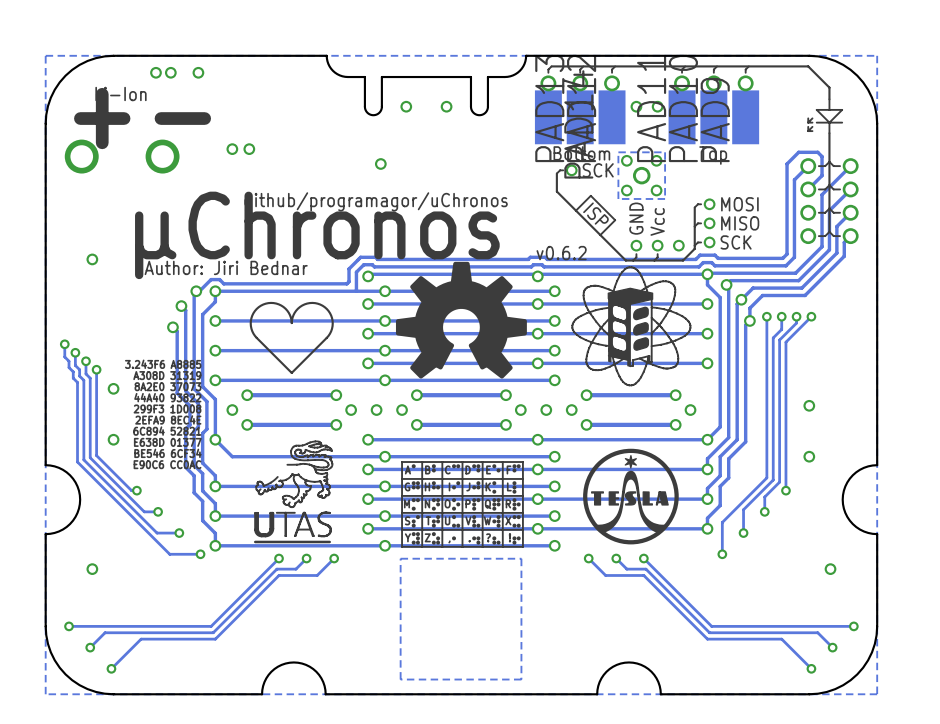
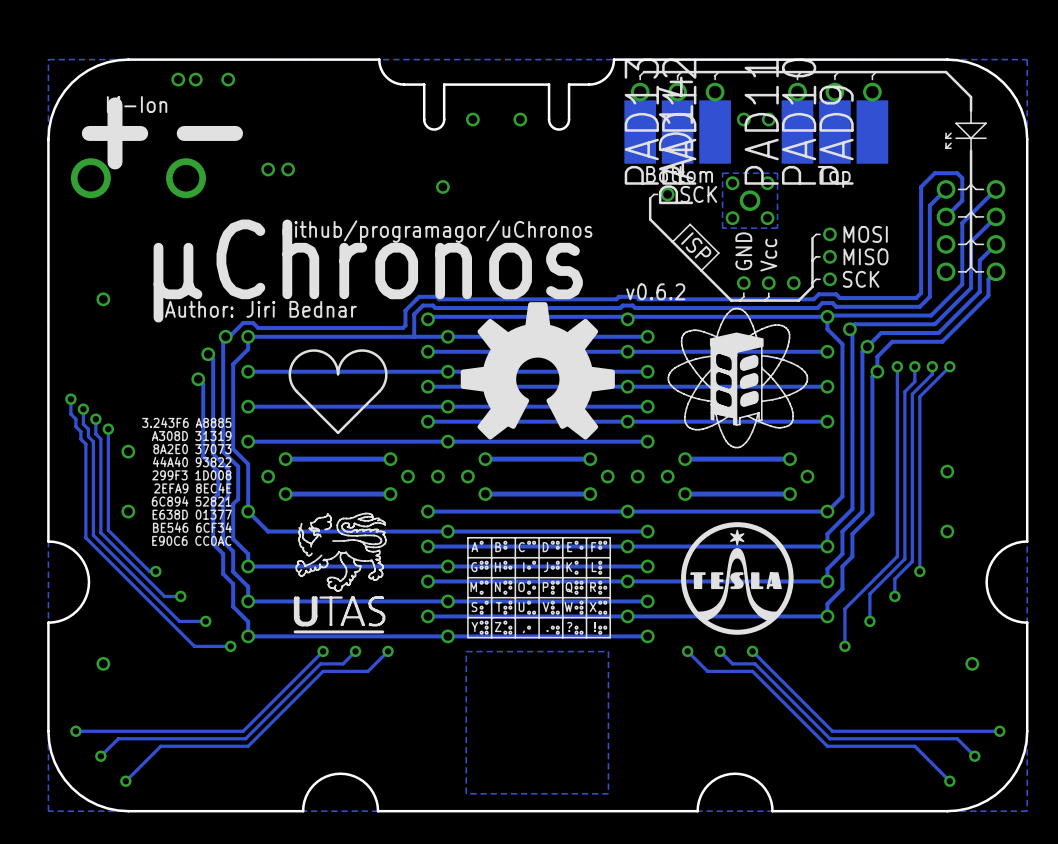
line: none -> (327, 521) (330, 518) (327, 514) (325, 516) (318, 518) (311, 522)
line: none -> (329, 522) (330, 527) (325, 529)
line: none -> (311, 522) (313, 528)
line: none -> (301, 523) (300, 529)
line: none -> (299, 527) (303, 531) (303, 538) (311, 543)
line: none -> (309, 528) (318, 530)
line: none -> (300, 529) (299, 541) (306, 552)
line: none -> (309, 528) (318, 530)
line: none -> (314, 531) (314, 535) (318, 534) (320, 536)
line: none -> (318, 535) (311, 543)
line: none -> (311, 543) (311, 546)
line: none -> (306, 552) (308, 555) (311, 553)

